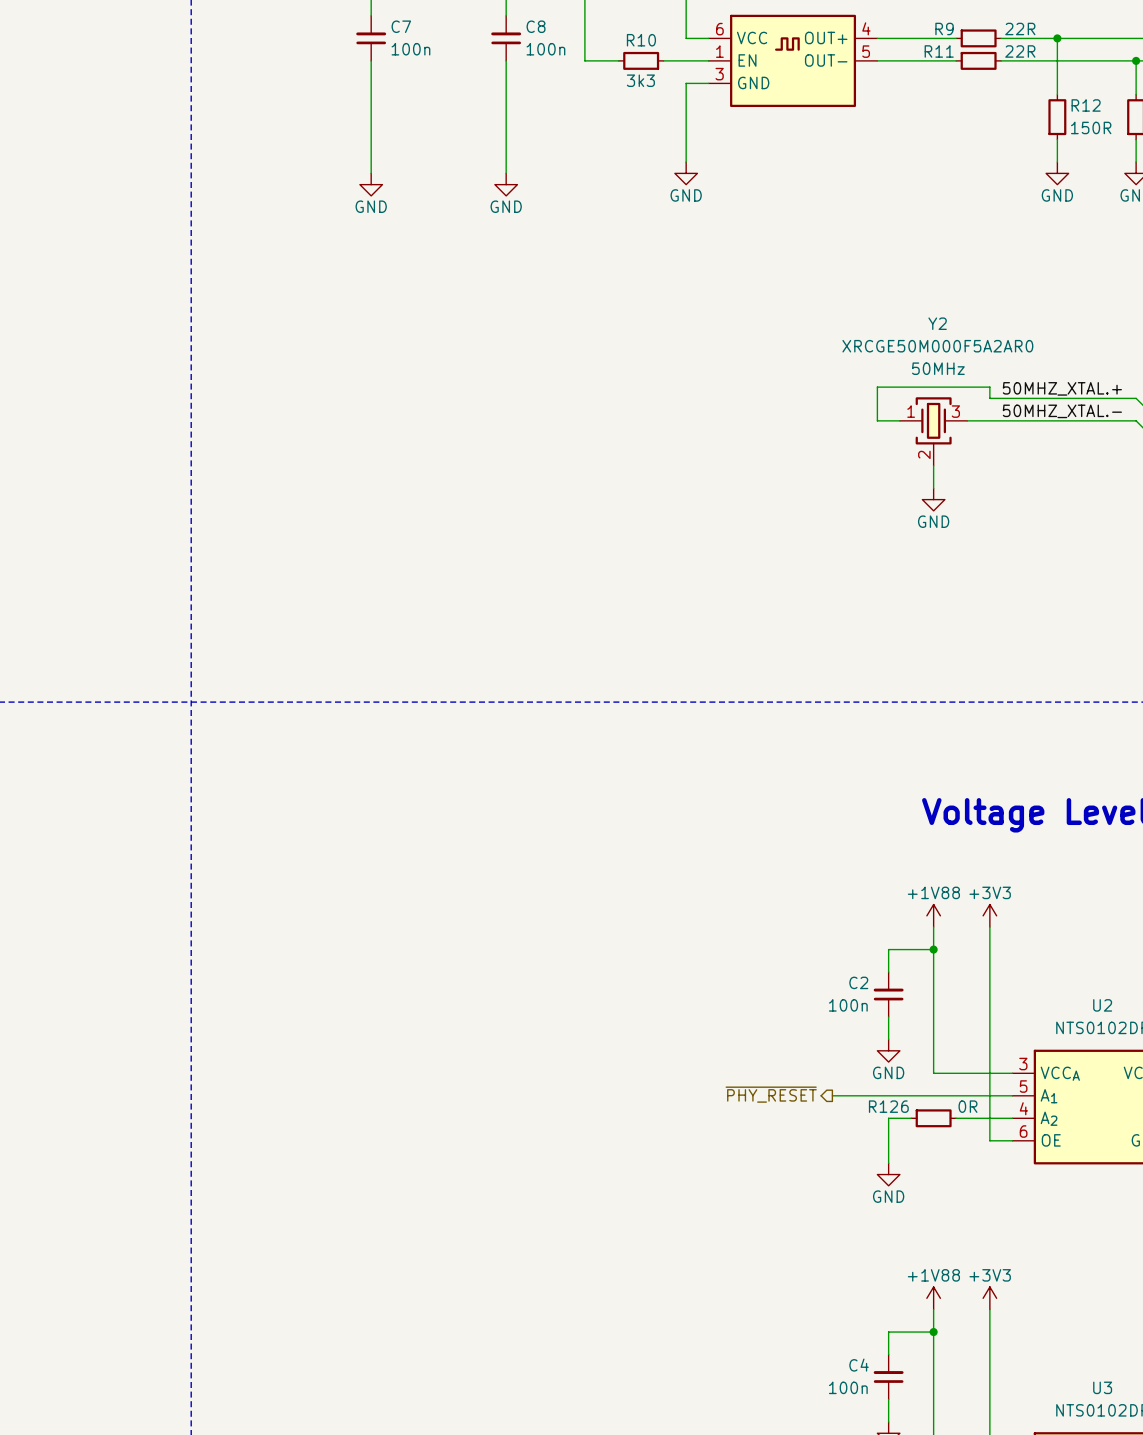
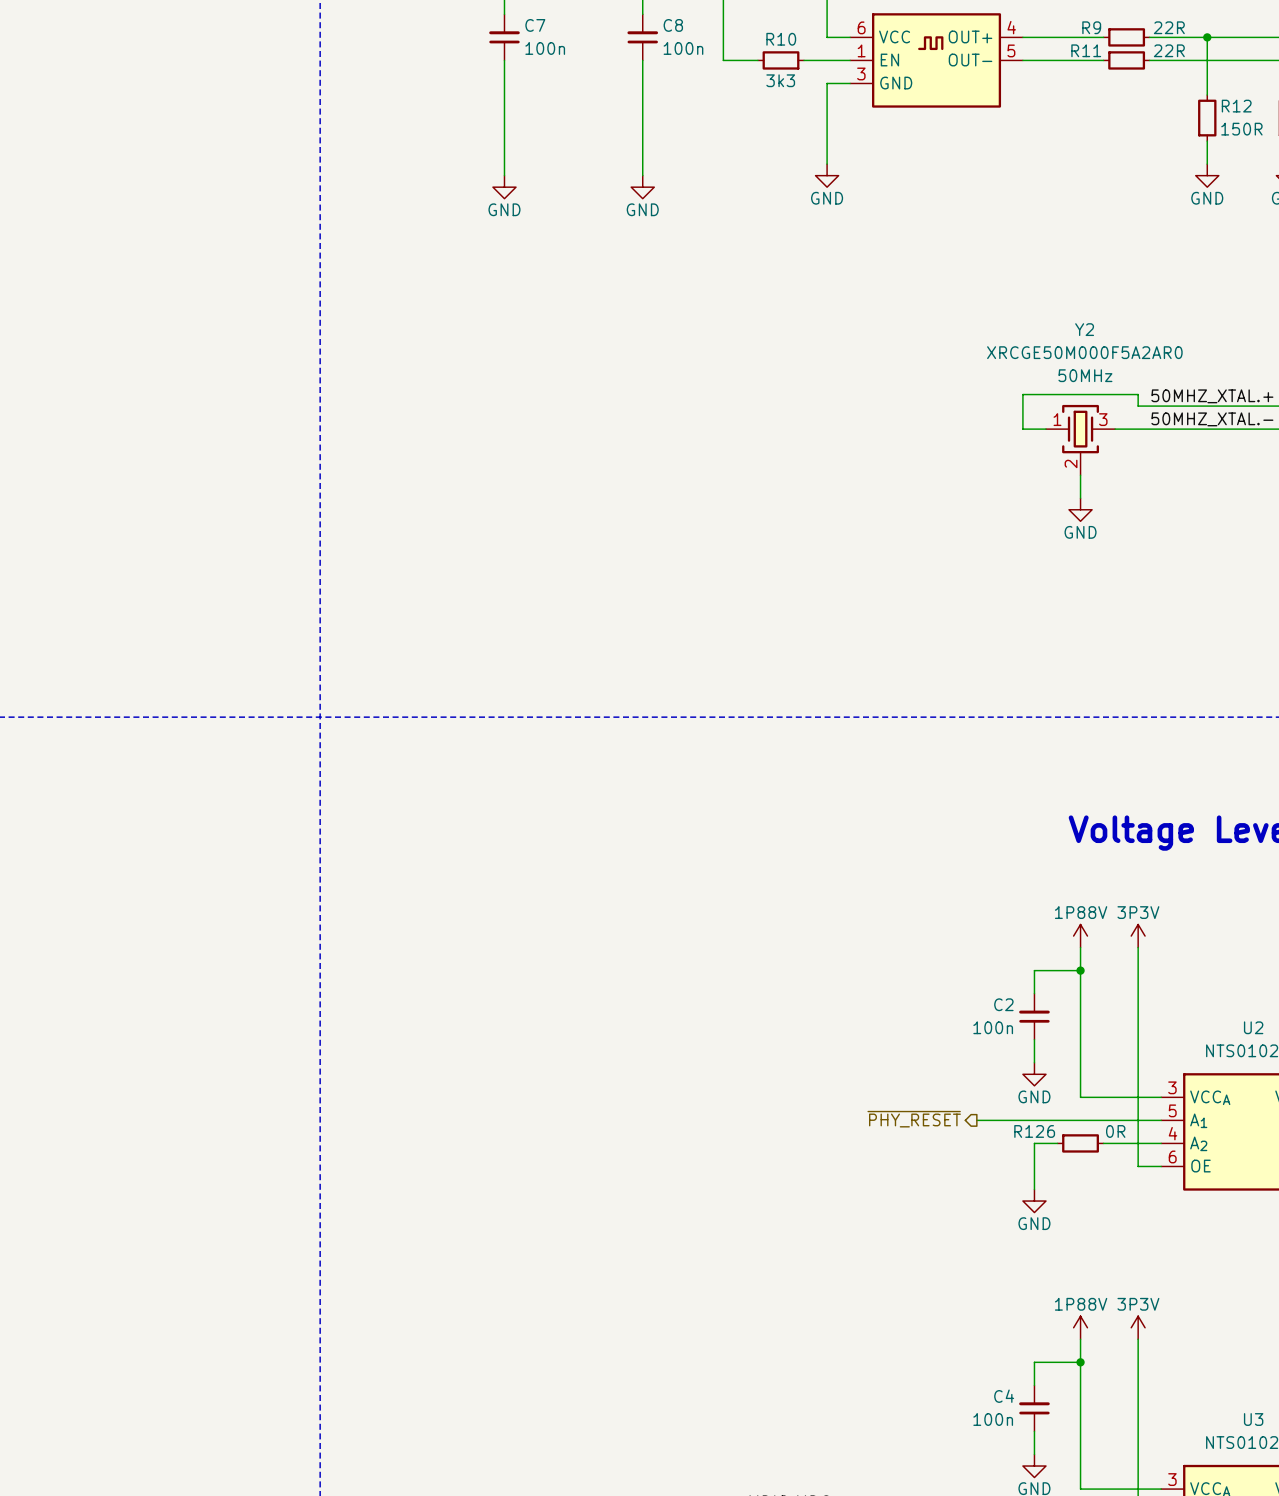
power symbol: +1V88 (933, 915) -> 1P88V (1080, 936)
power symbol: +3V3 (989, 915) -> 3P3V (1138, 936)
power symbol: +1V88 (933, 1298) -> 1P88V (1080, 1327)
power symbol: +3V3 (989, 1298) -> 3P3V (1138, 1327)

